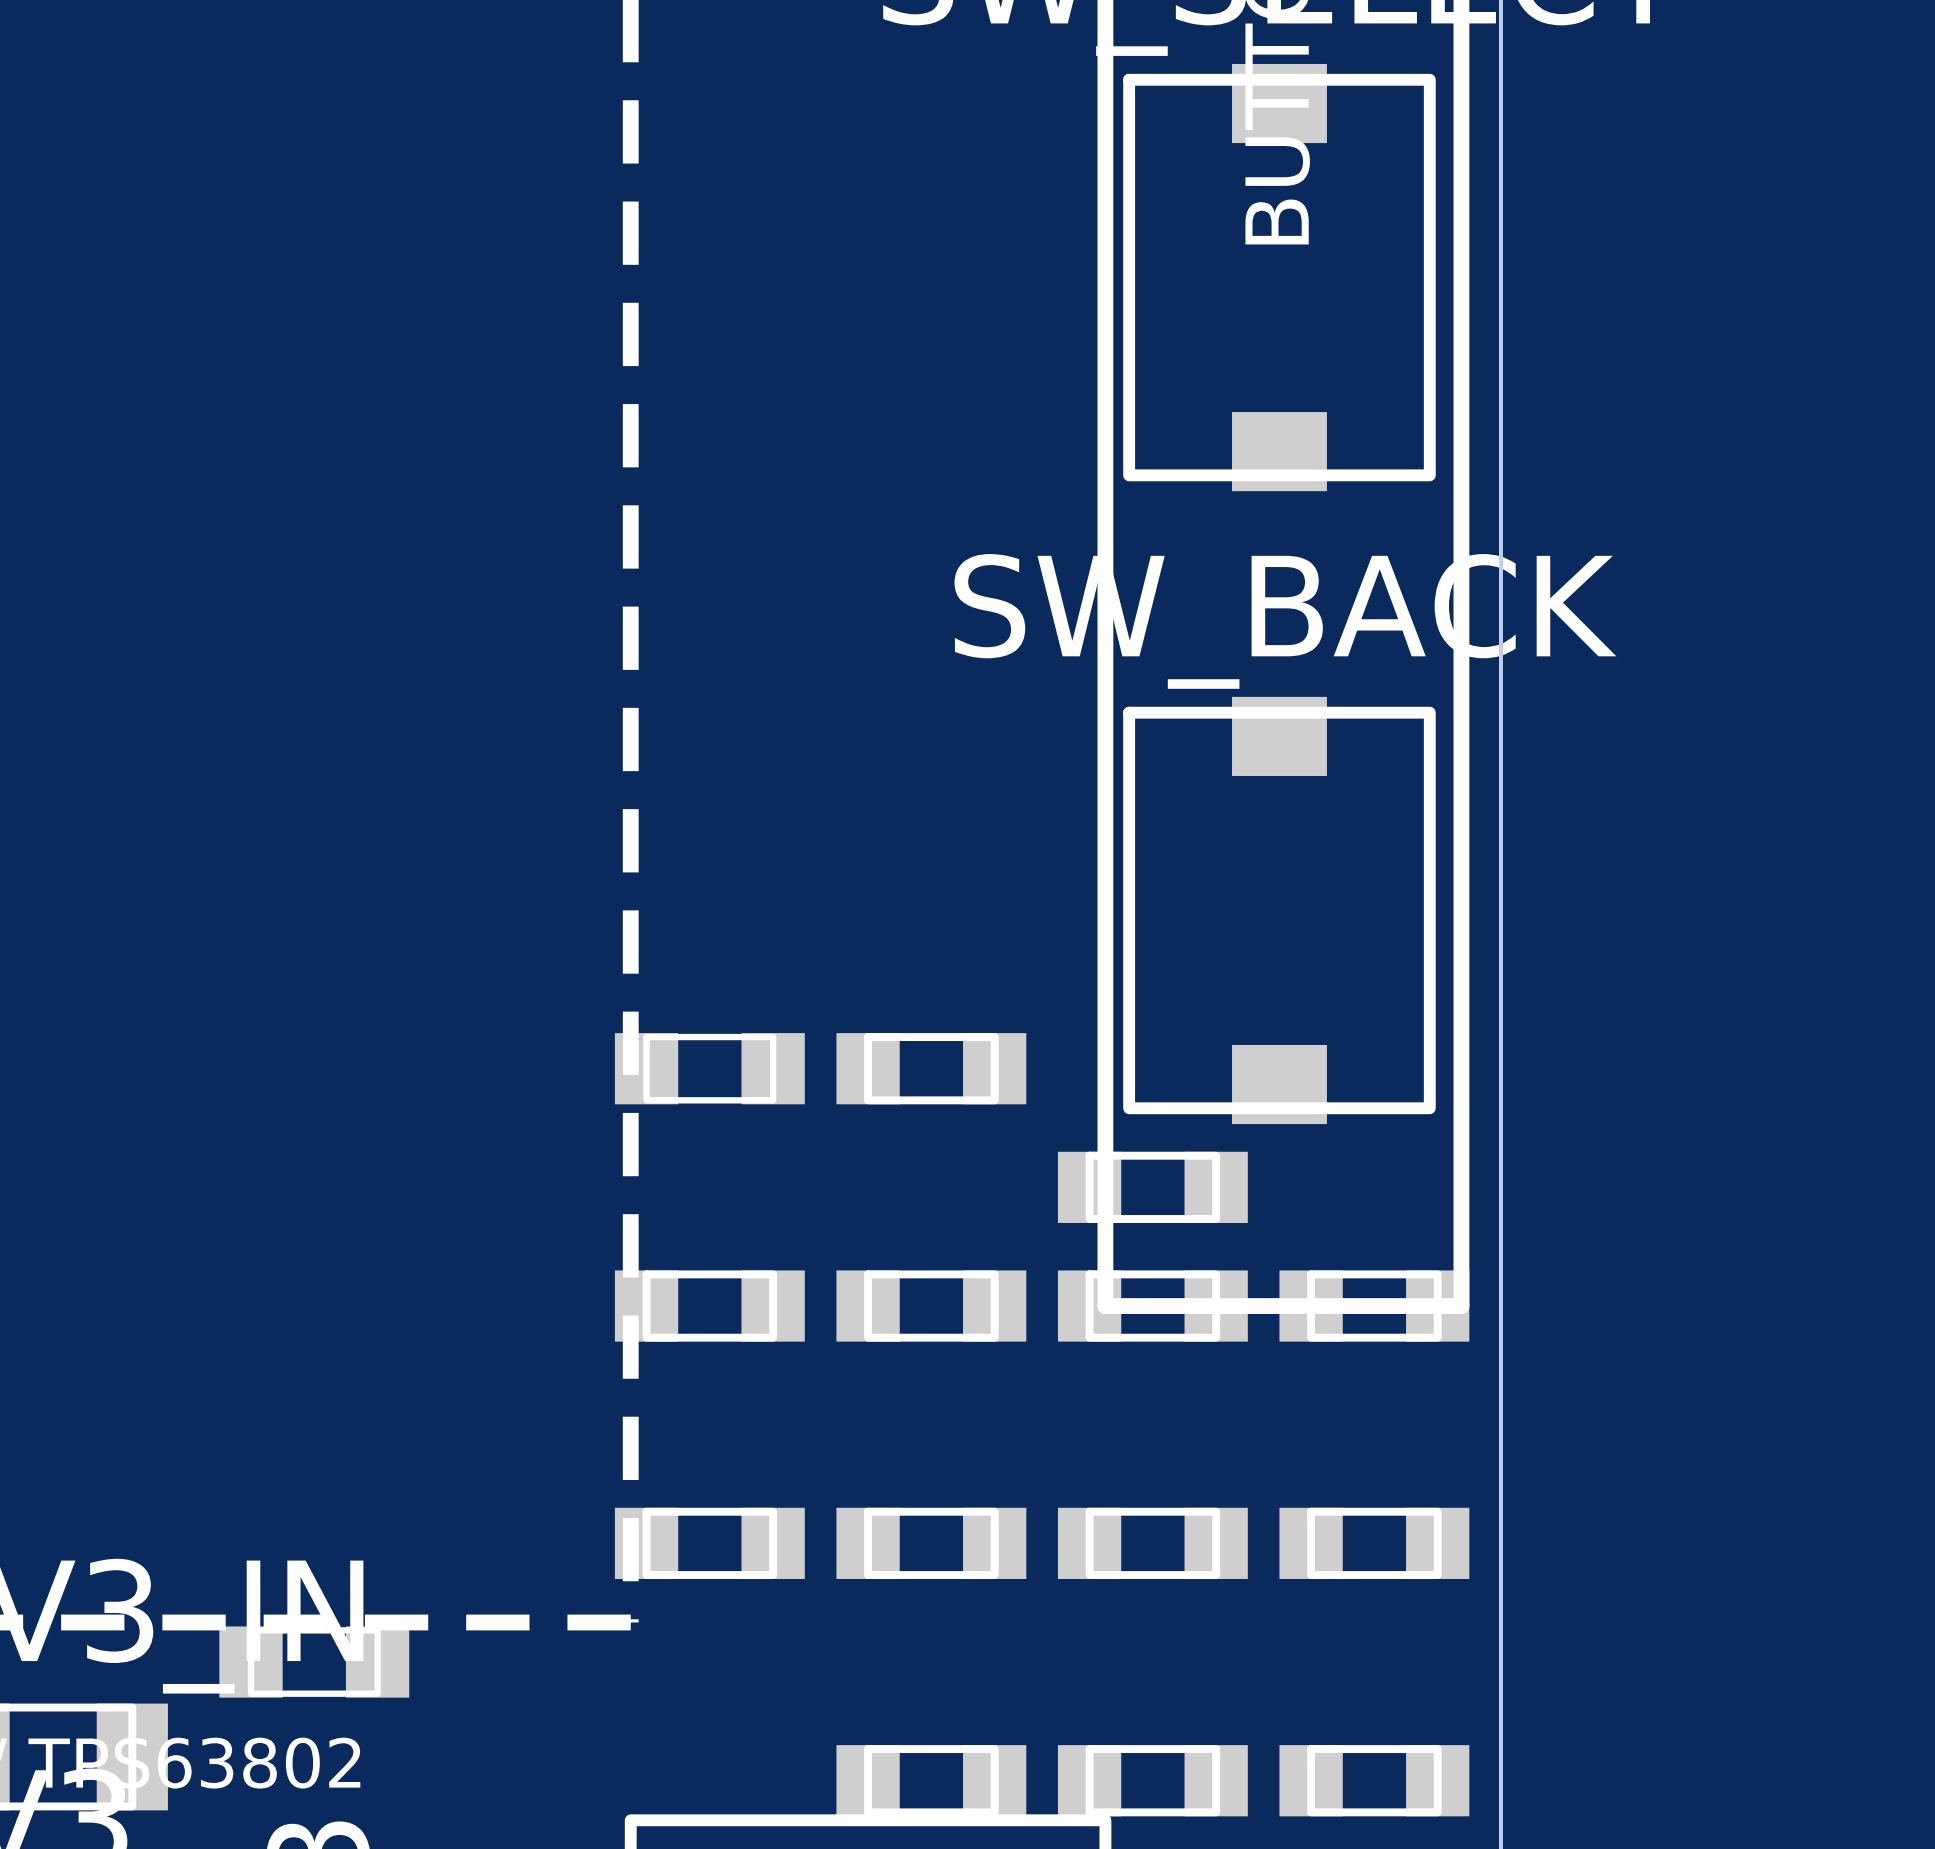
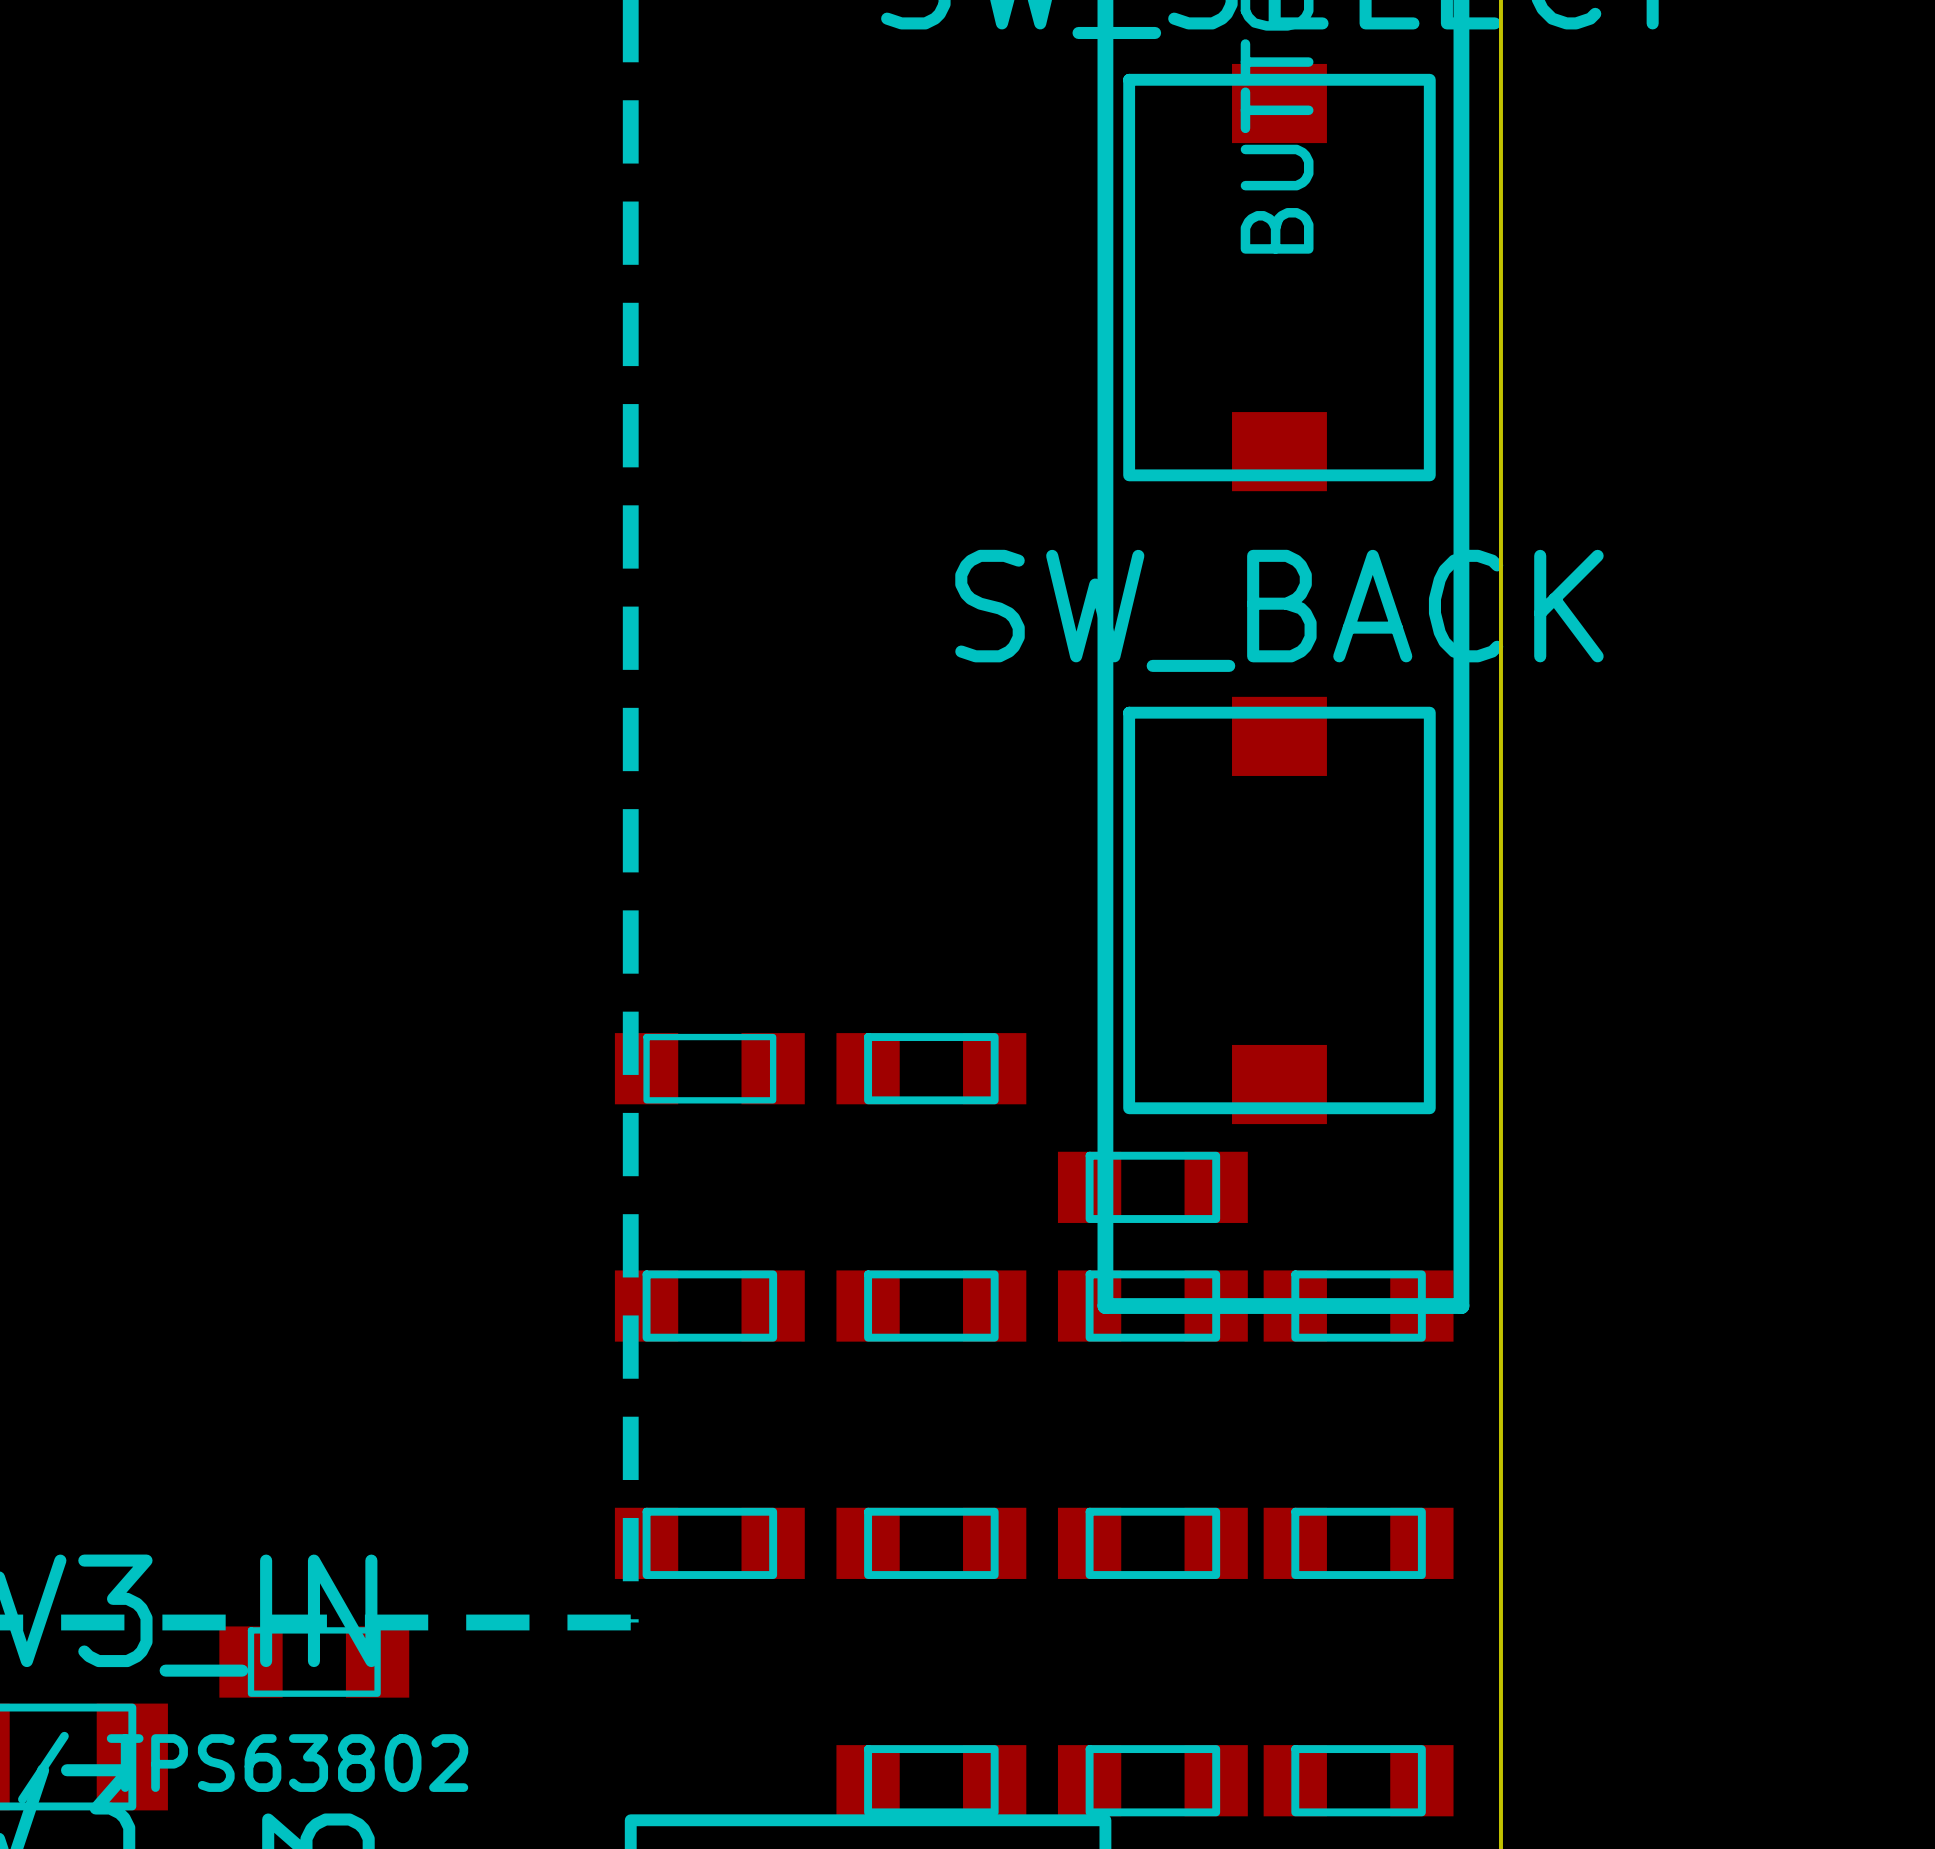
part position: (1374, 1306) -> (1358, 1306)
part position: (1374, 1543) -> (1358, 1543)
part position: (1374, 1780) -> (1358, 1780)

